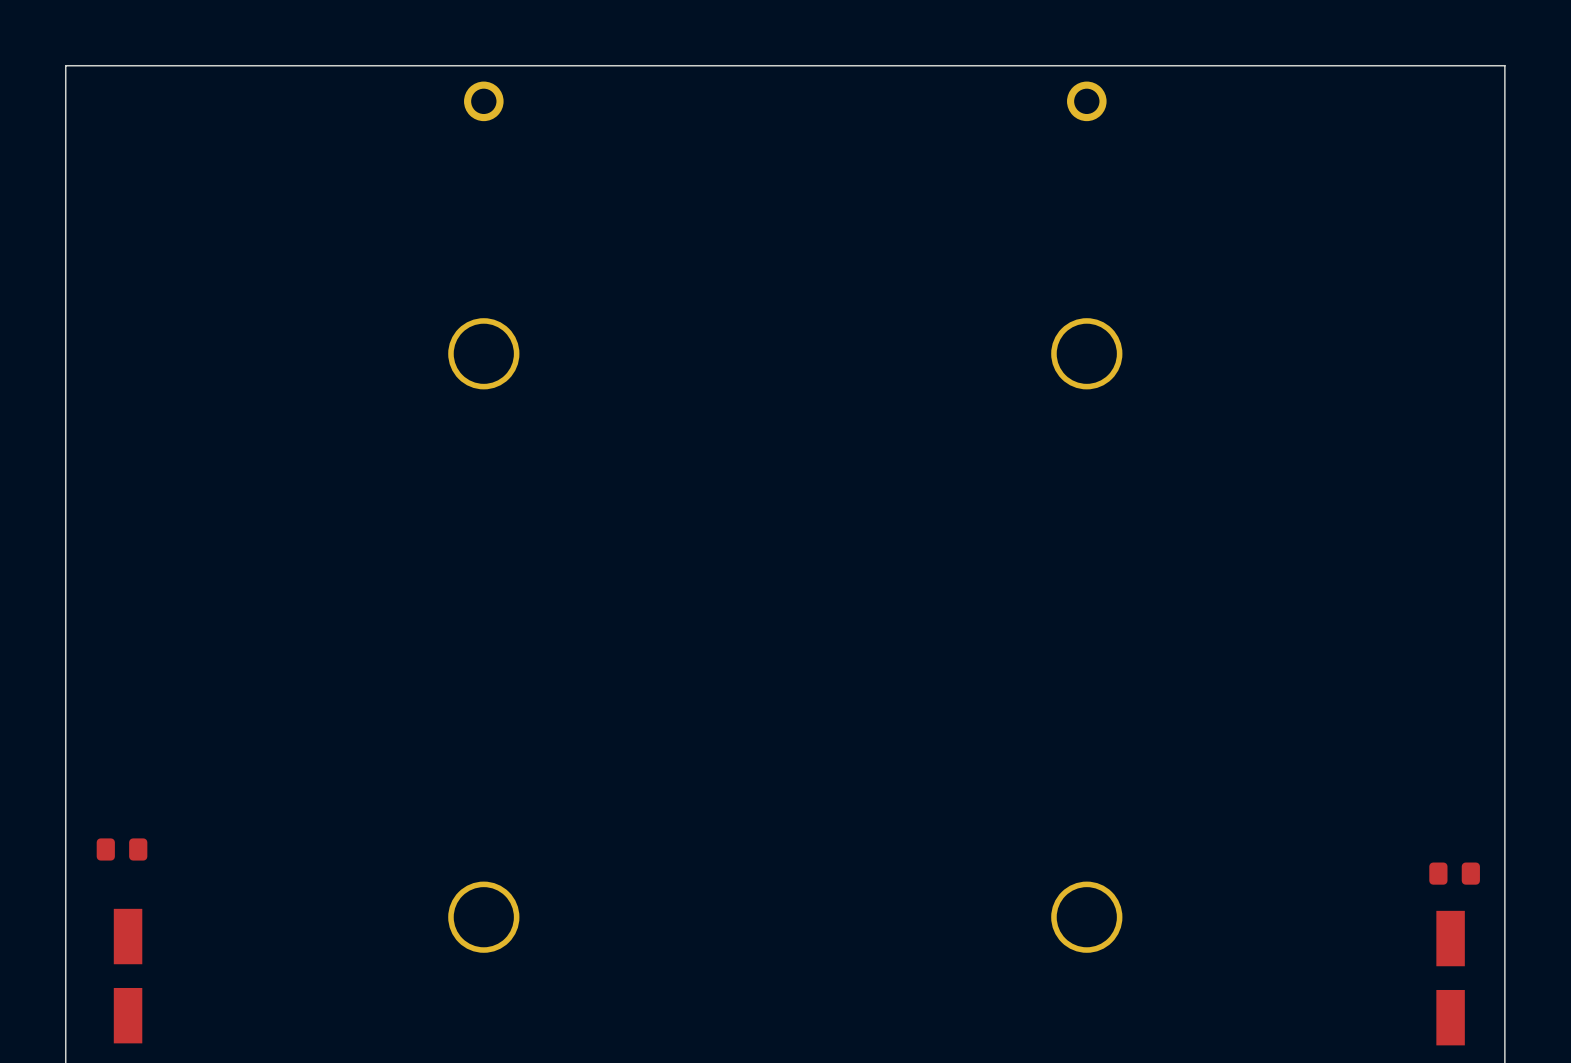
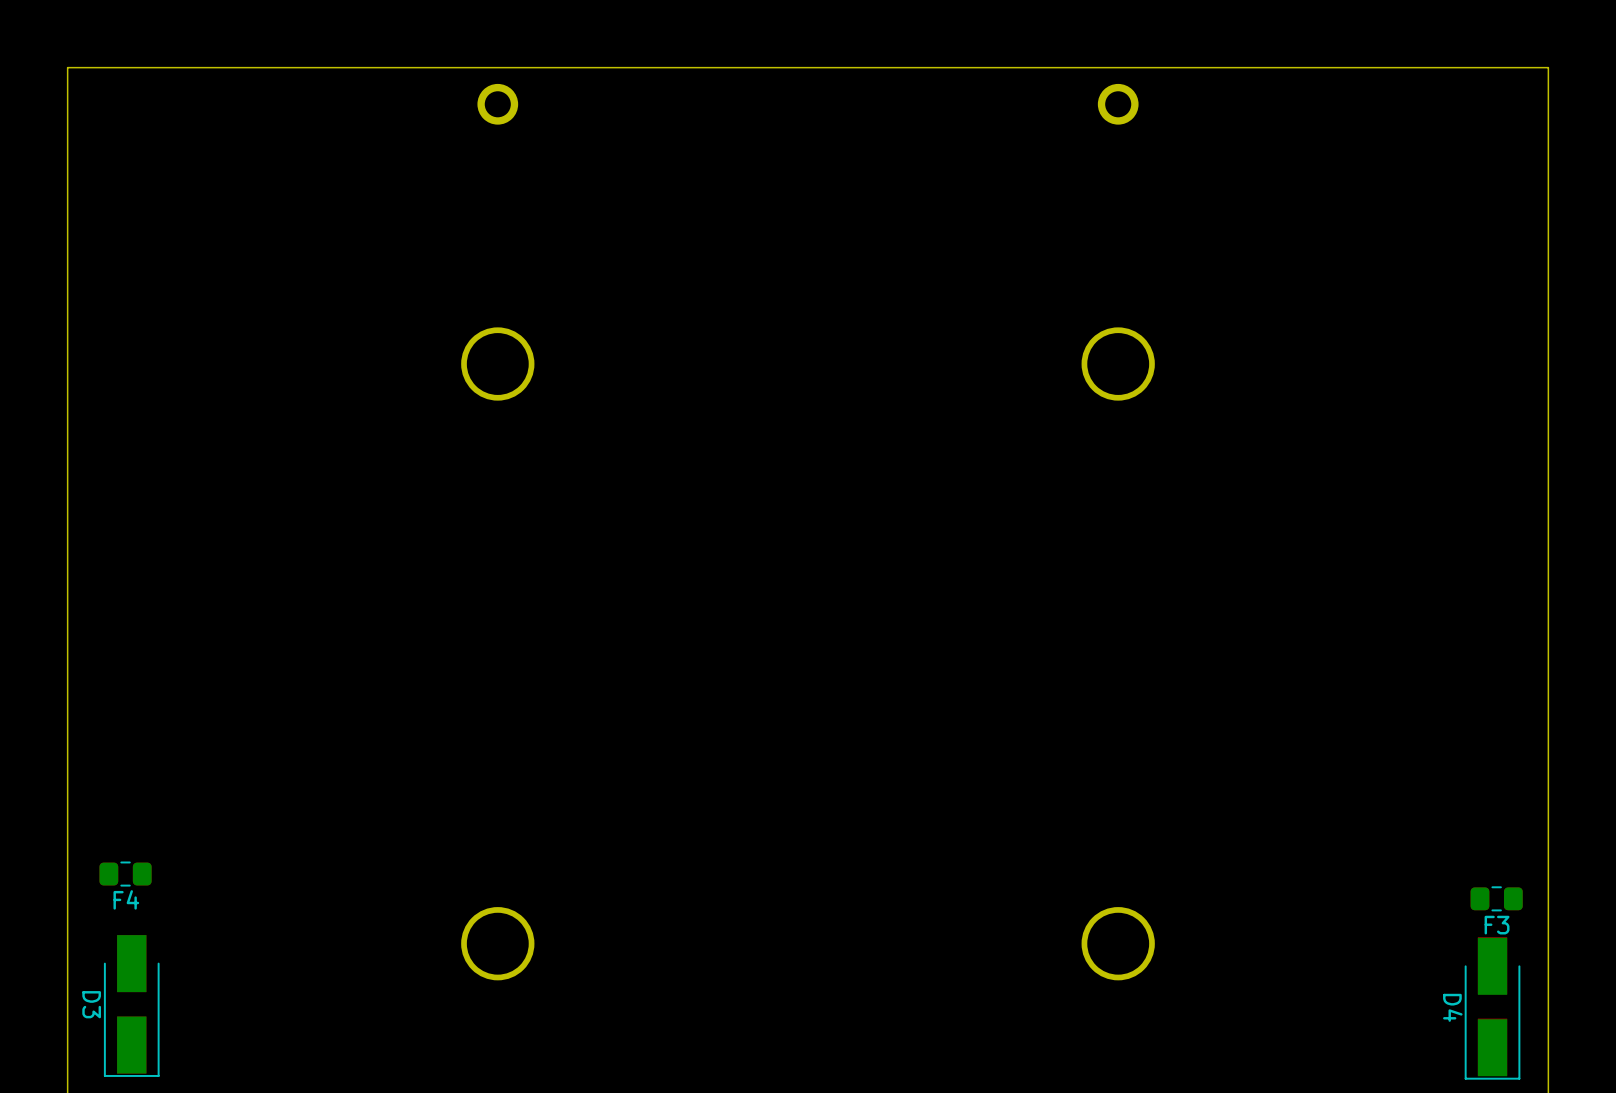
F4: none -> (125, 874)
F3: none -> (1496, 898)
D3: none -> (131, 1006)
D4: none -> (1492, 1008)

